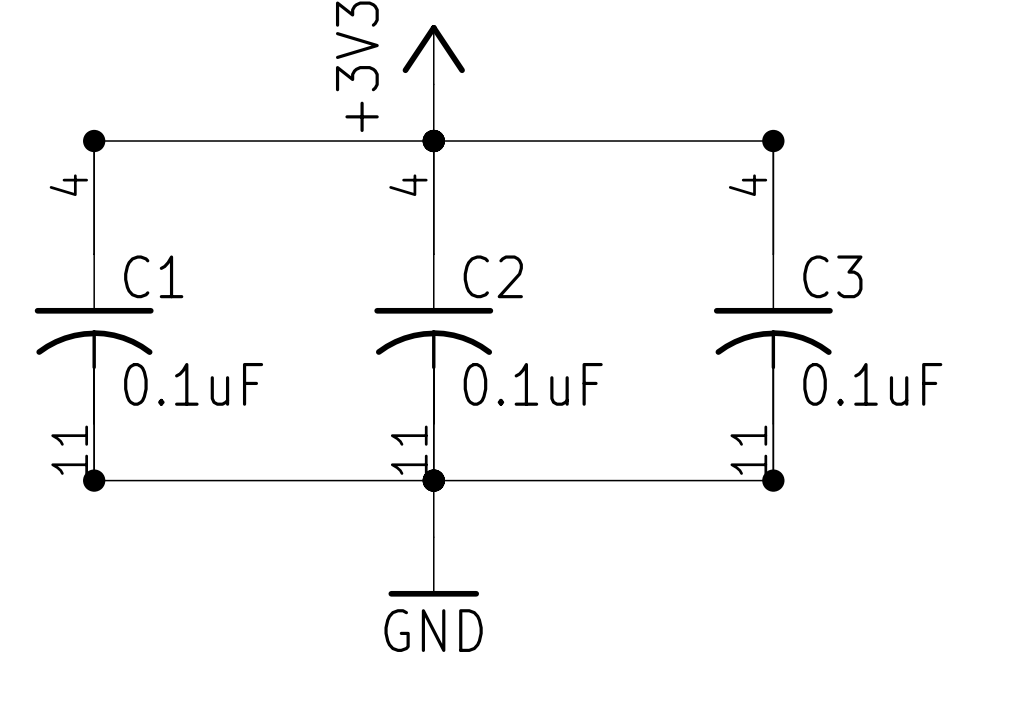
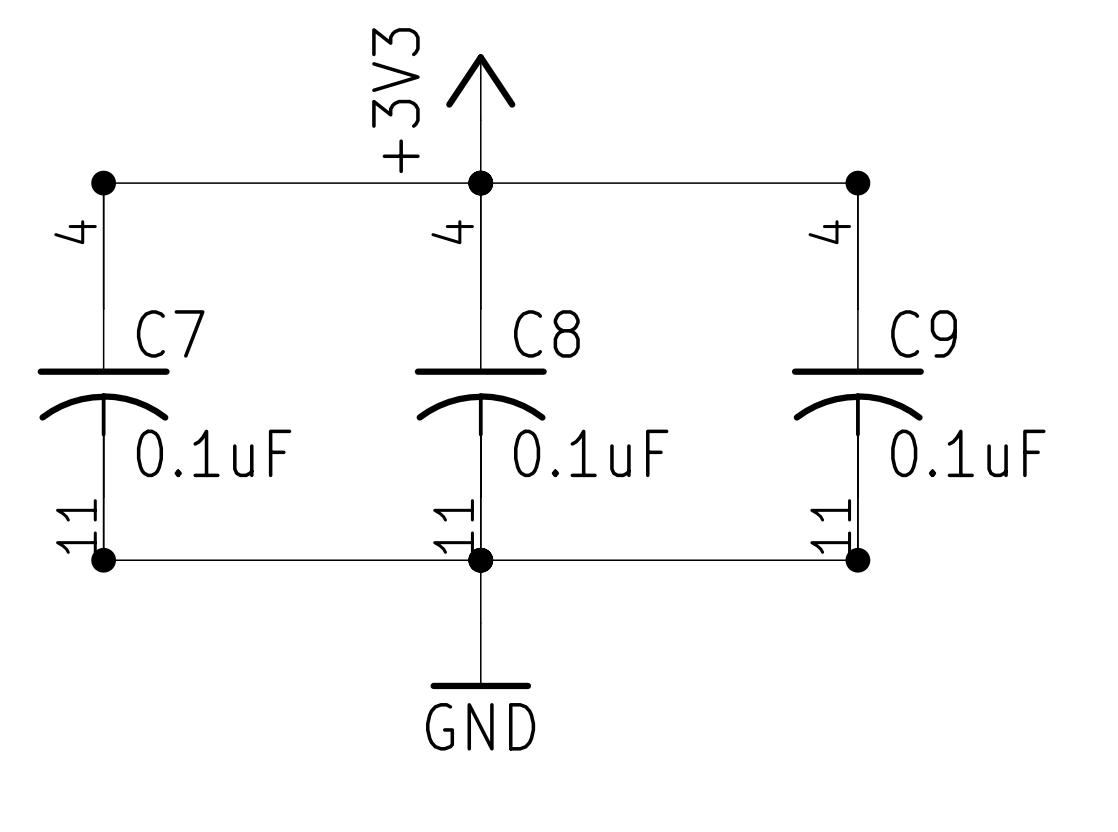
C1 name: C1 (153, 276) -> C7 (170, 333)
C2 name: C2 (493, 276) -> C8 (546, 333)
C3 name: C3 (832, 276) -> C9 (924, 333)

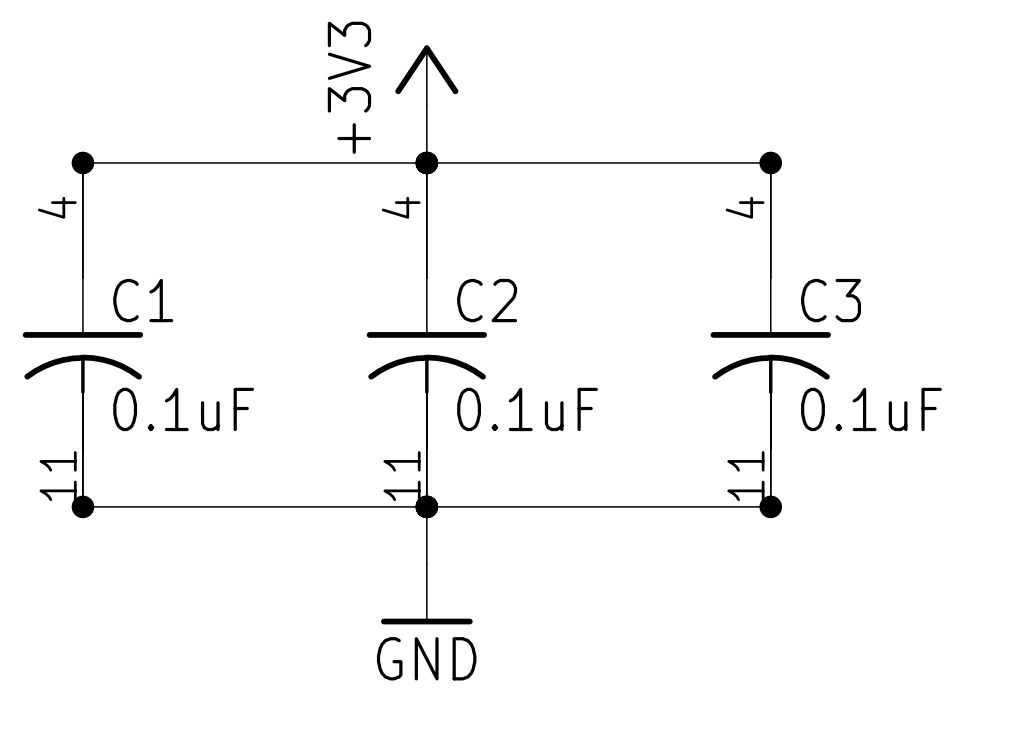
C7 name: C7 (170, 333) -> C1 (143, 300)
C8 name: C8 (546, 333) -> C2 (487, 300)
C9 name: C9 (924, 333) -> C3 (831, 300)

